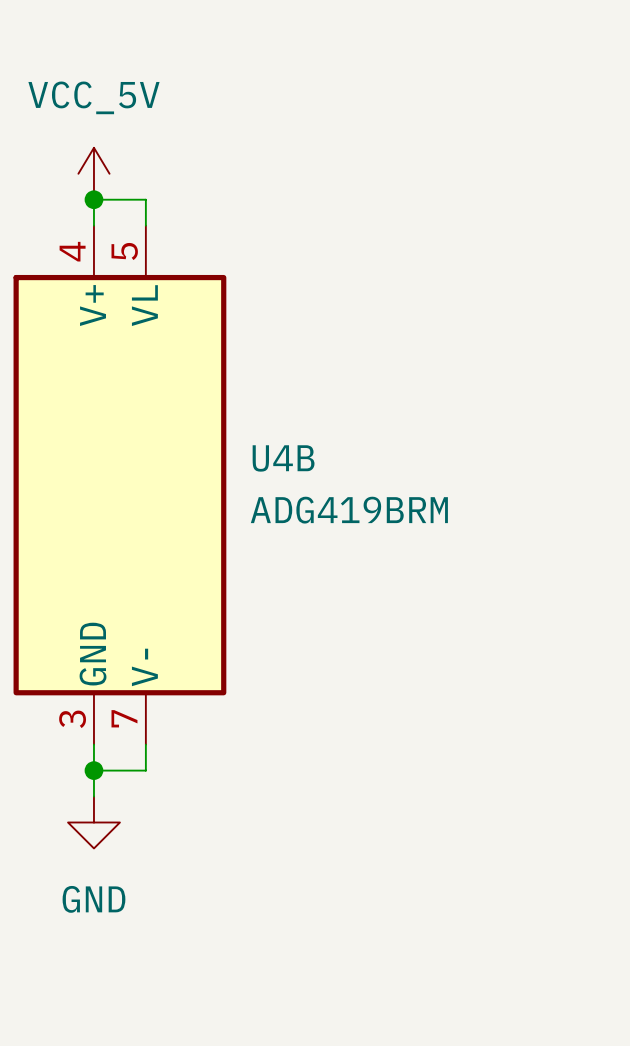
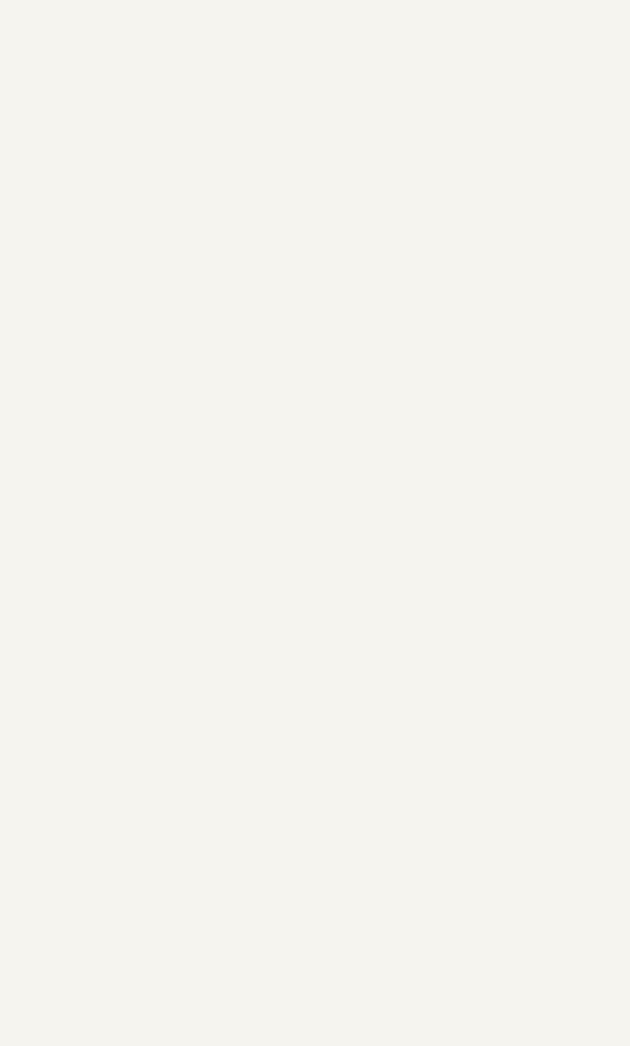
power symbol: VCC_5V (93, 173) -> none
junction: (93, 199) -> none
wire: (93, 225) (93, 199) (145, 199) (145, 225) -> none
U4B: ADG419BRM (119, 485) -> none
wire: (93, 744) (93, 796) -> none
wire: (145, 744) (145, 770) (93, 770) -> none
junction: (93, 770) -> none
power symbol: GND (93, 822) -> none

